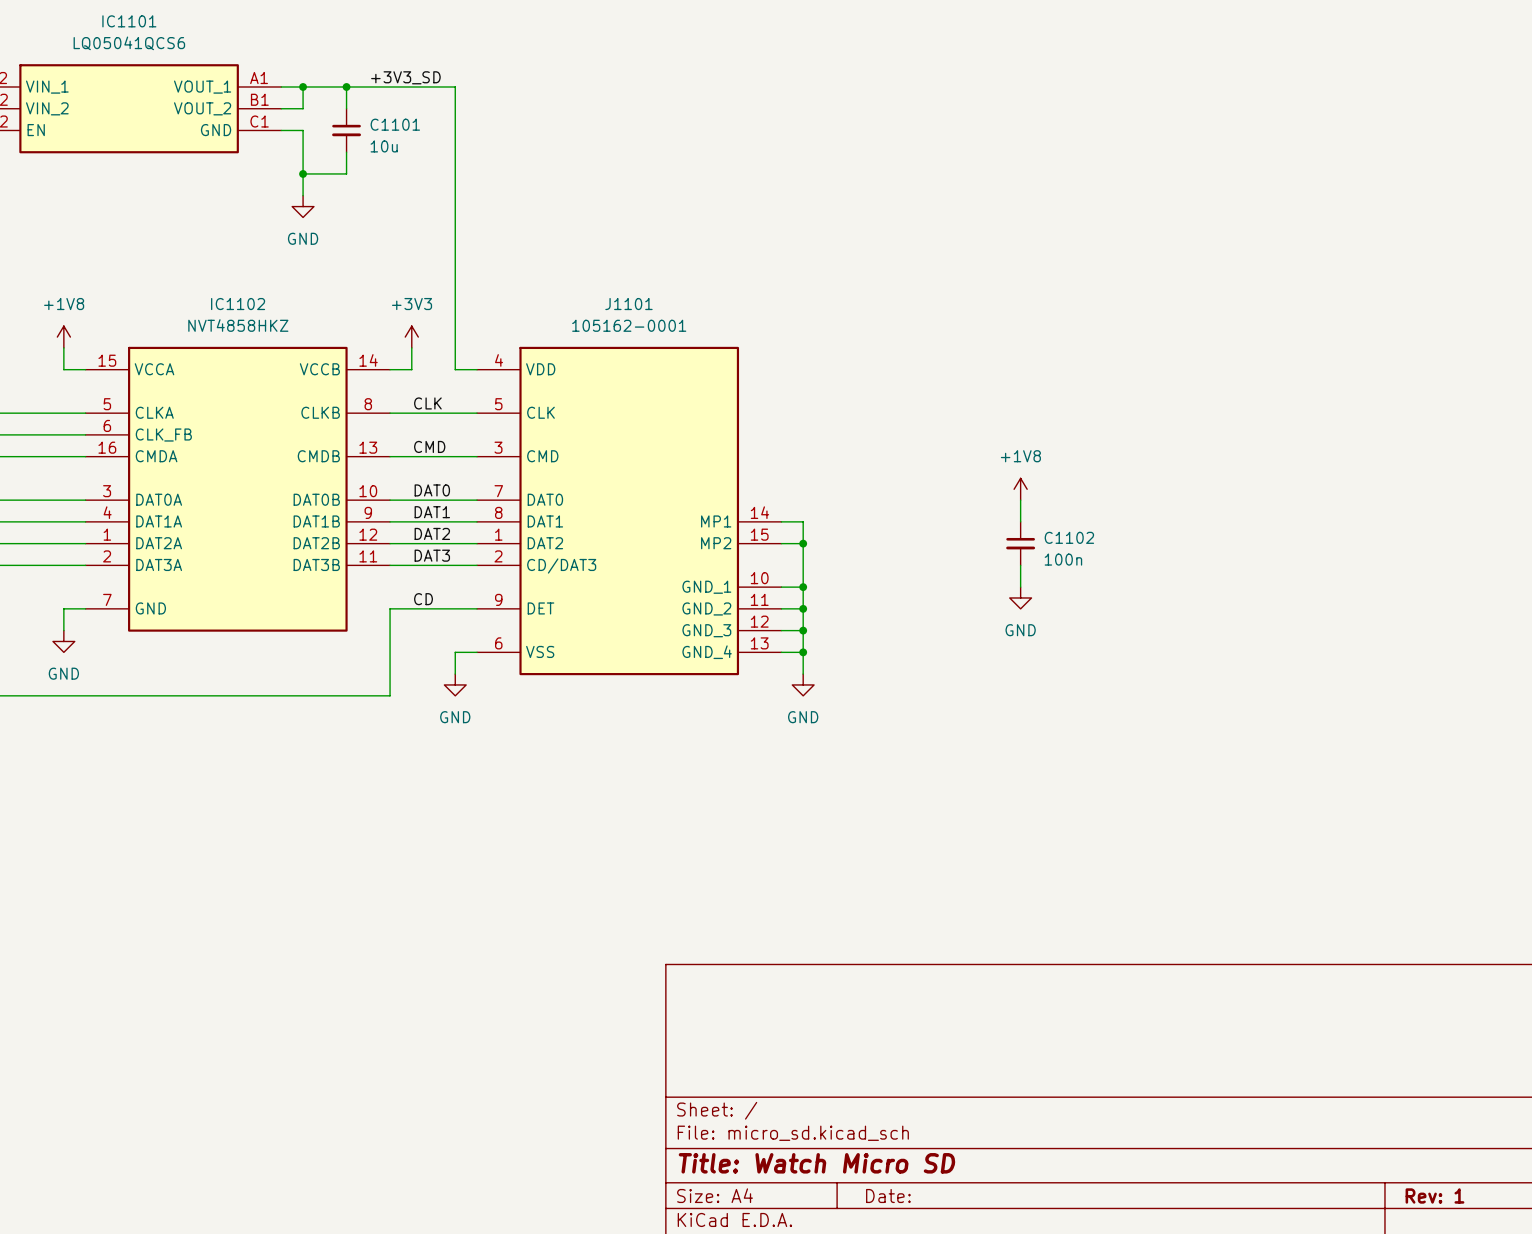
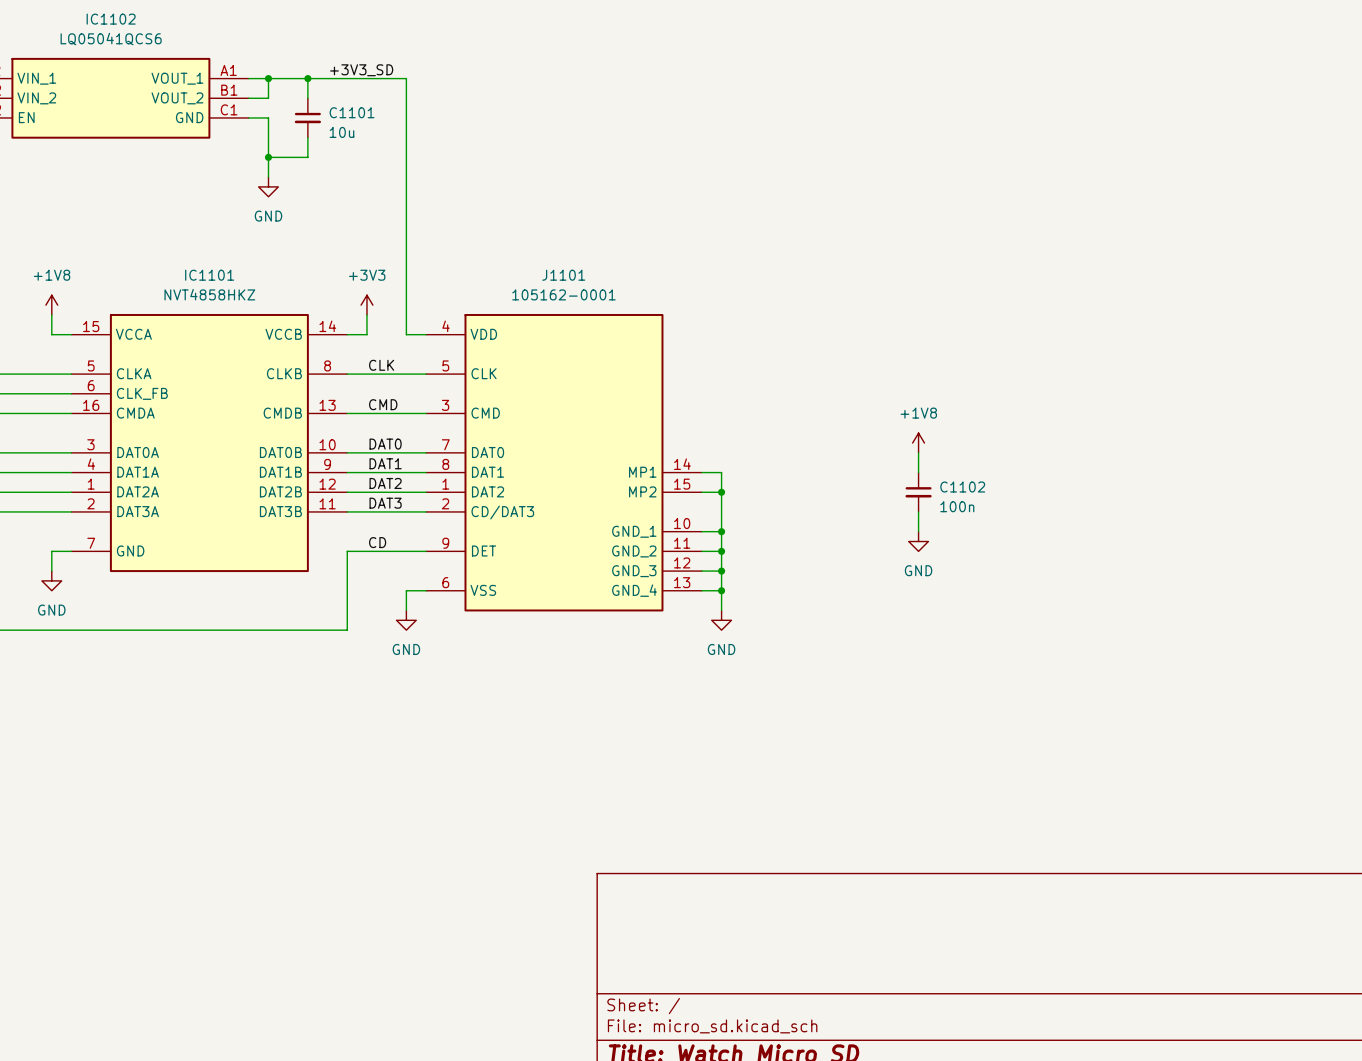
IC1101 name: IC1101 (129, 21) -> IC1102 (111, 19)
IC1102 name: IC1102 (238, 304) -> IC1101 (209, 275)

